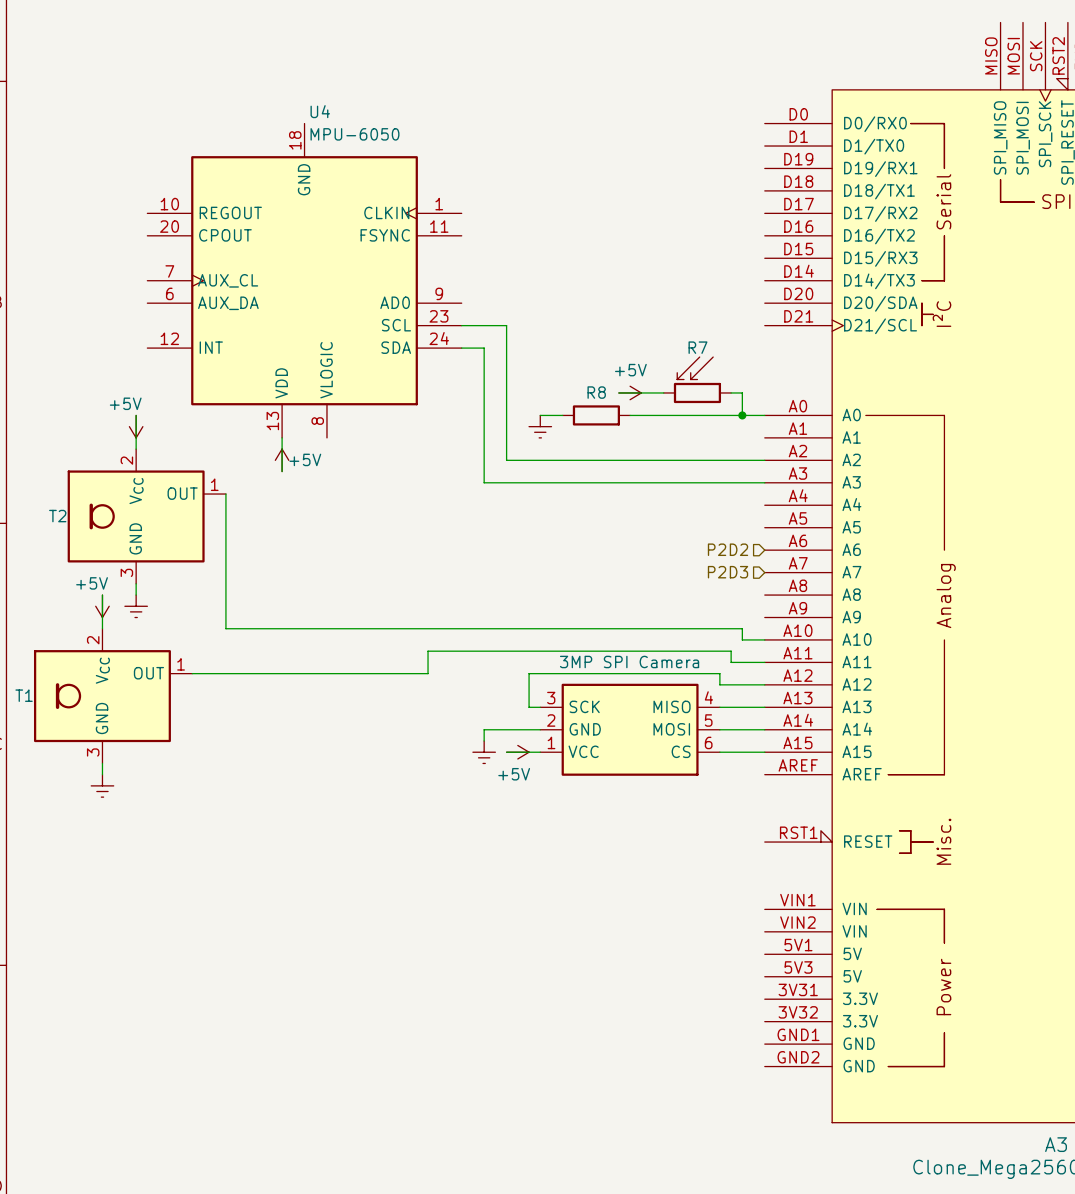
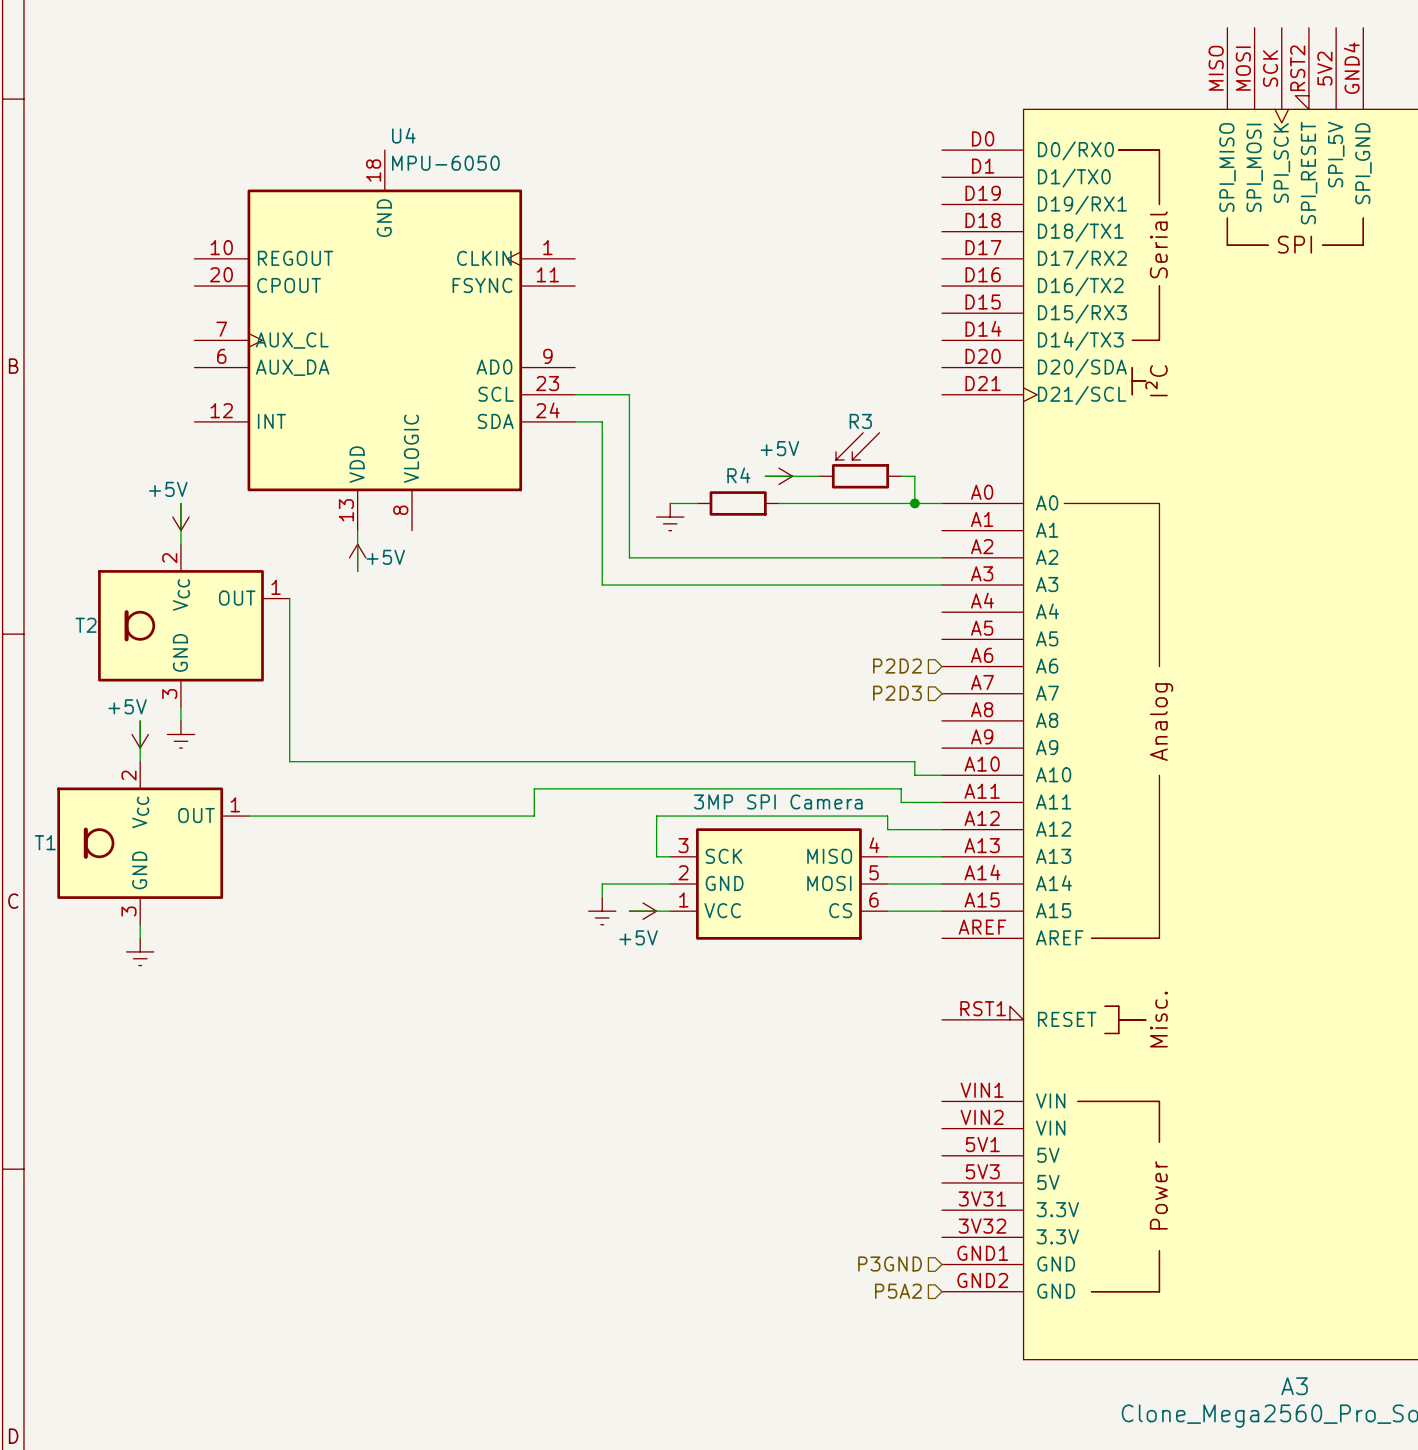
R7 name: R7 (697, 347) -> R3 (860, 421)
R8 name: R8 (596, 392) -> R4 (738, 475)
hierarchical label: none -> P3GND (890, 1264)
hierarchical label: none -> P5A2 (898, 1291)

